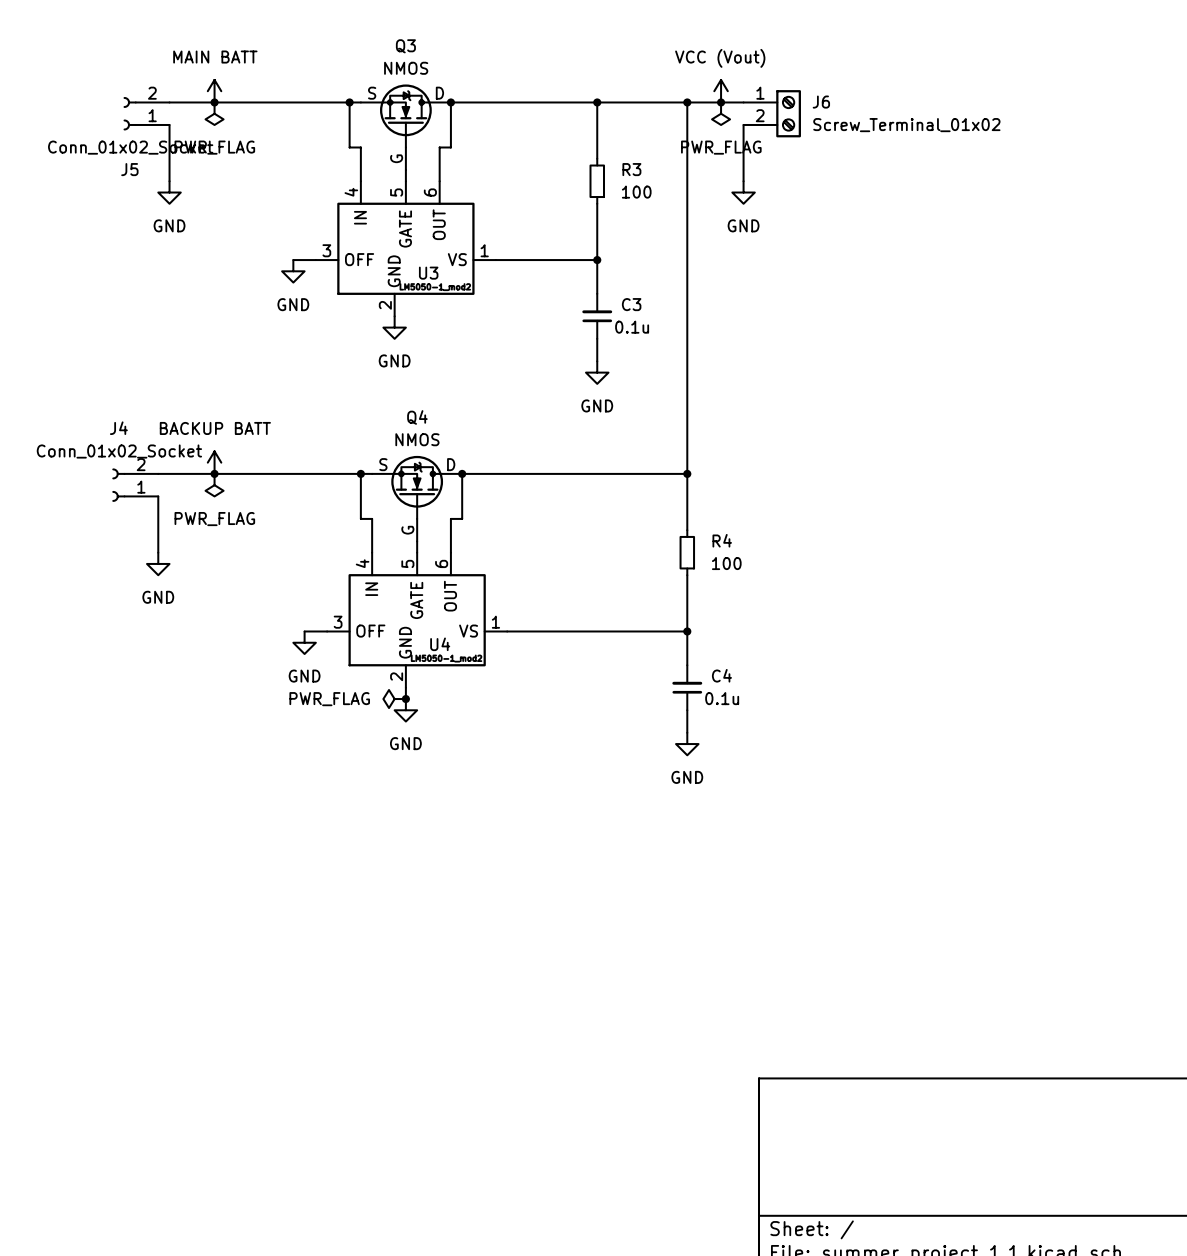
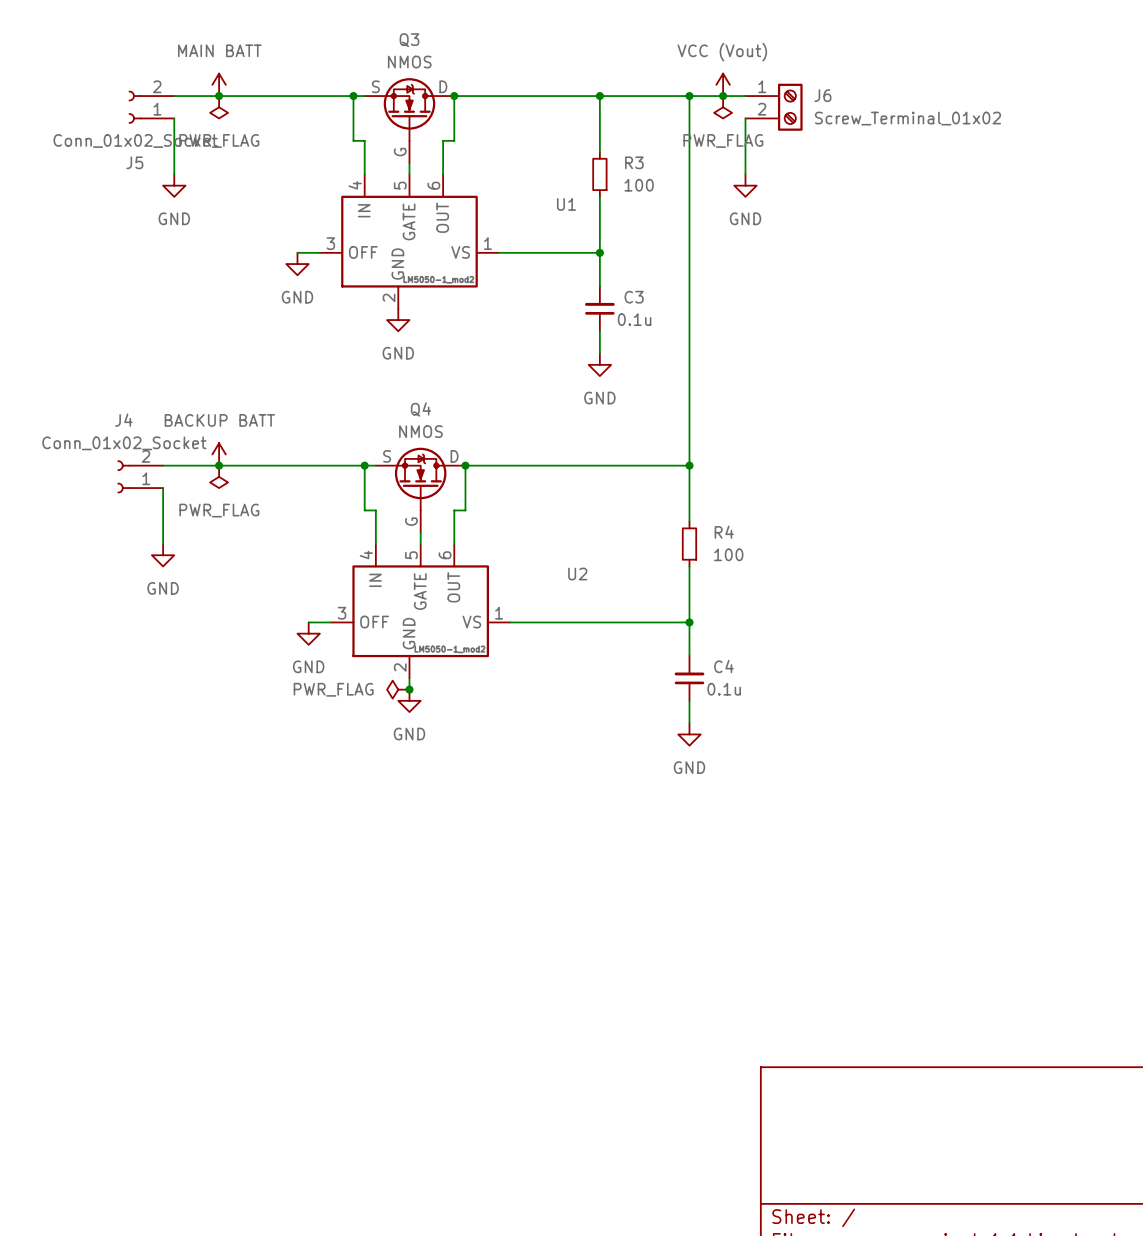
U3 name: U3 (428, 273) -> U1 (566, 204)
U4 name: U4 (440, 644) -> U2 (577, 574)

